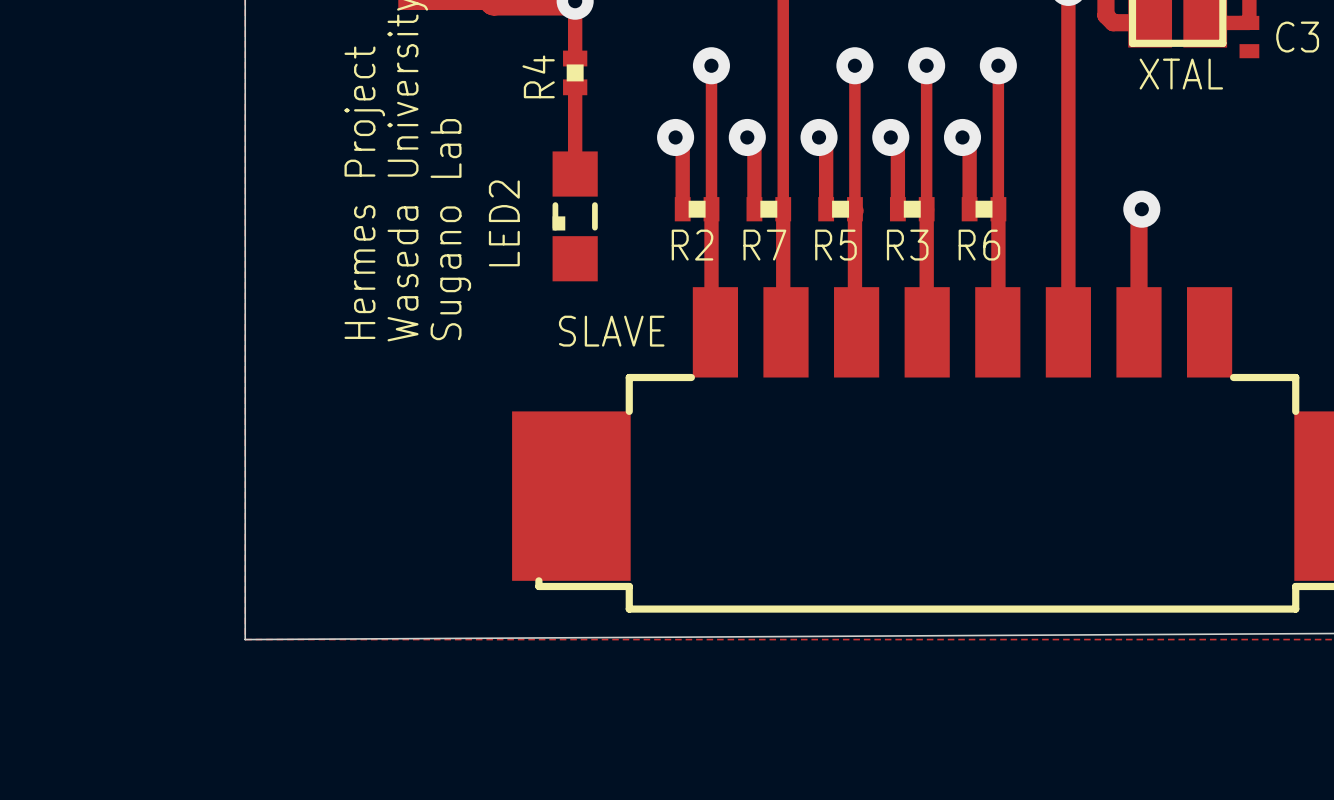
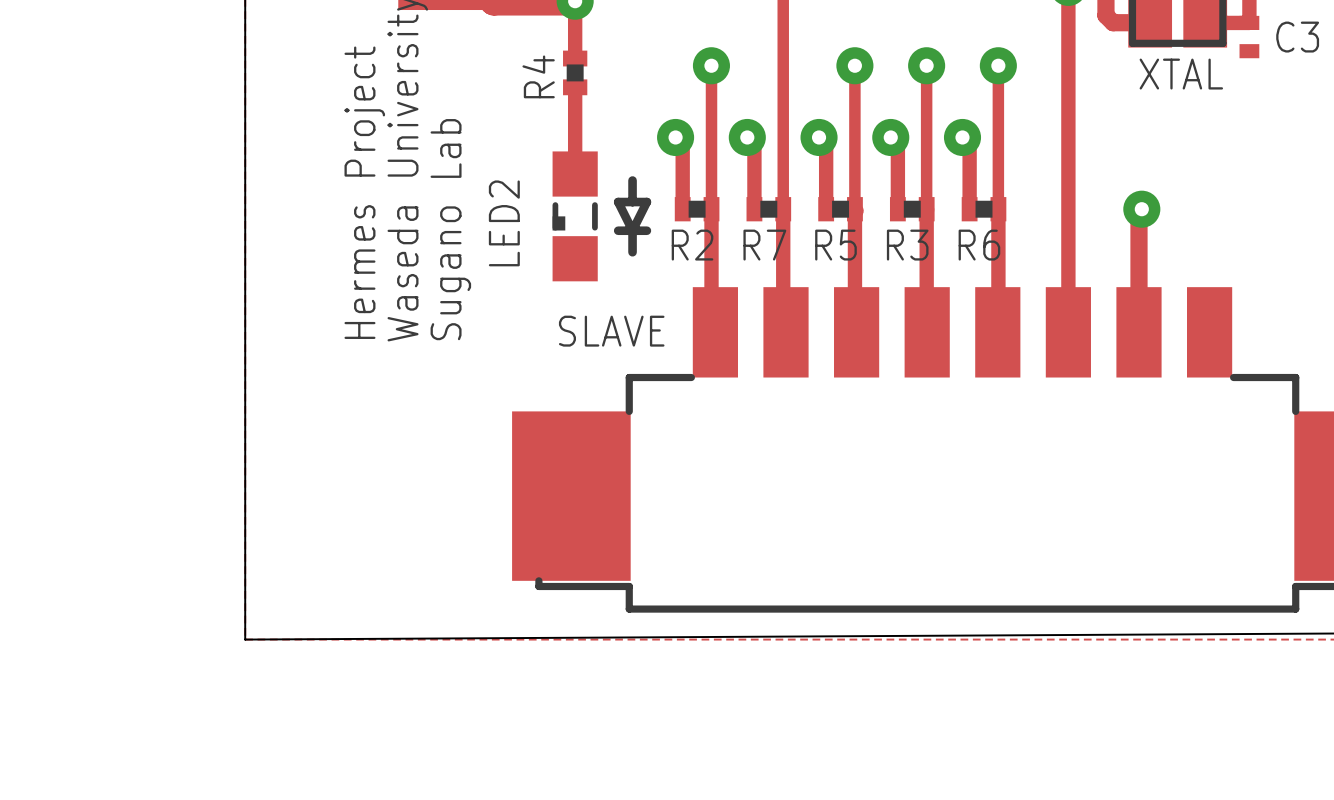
line: none -> (632, 180) (632, 202)
line: none -> (618, 230) (646, 230)
line: none -> (632, 230) (632, 252)
line: none -> (632, 230) (646, 202) (618, 202) (632, 230)

